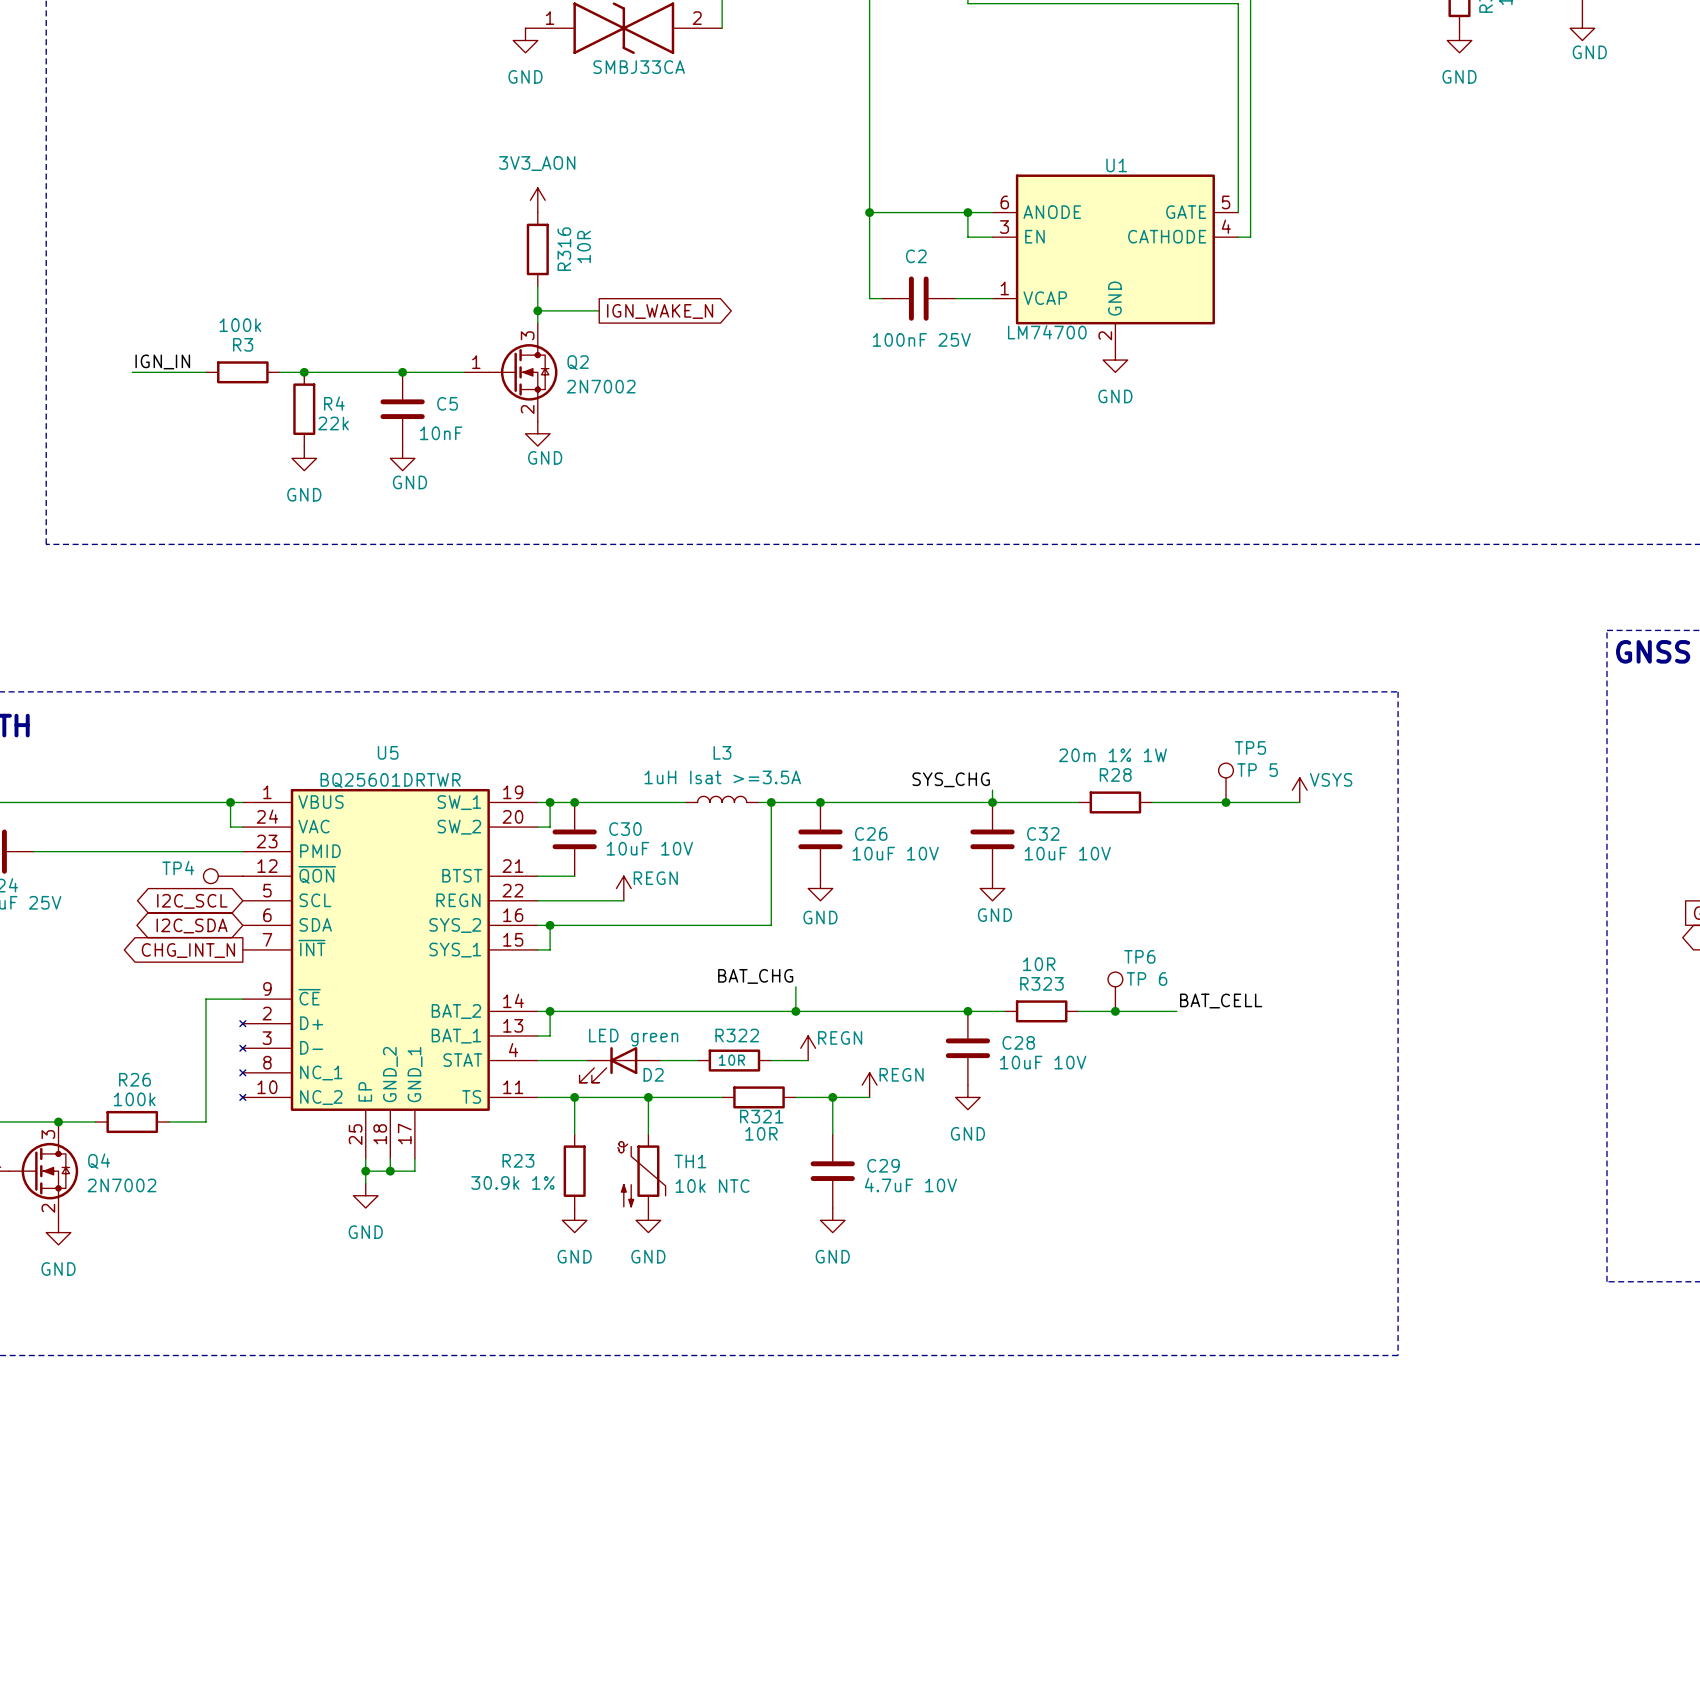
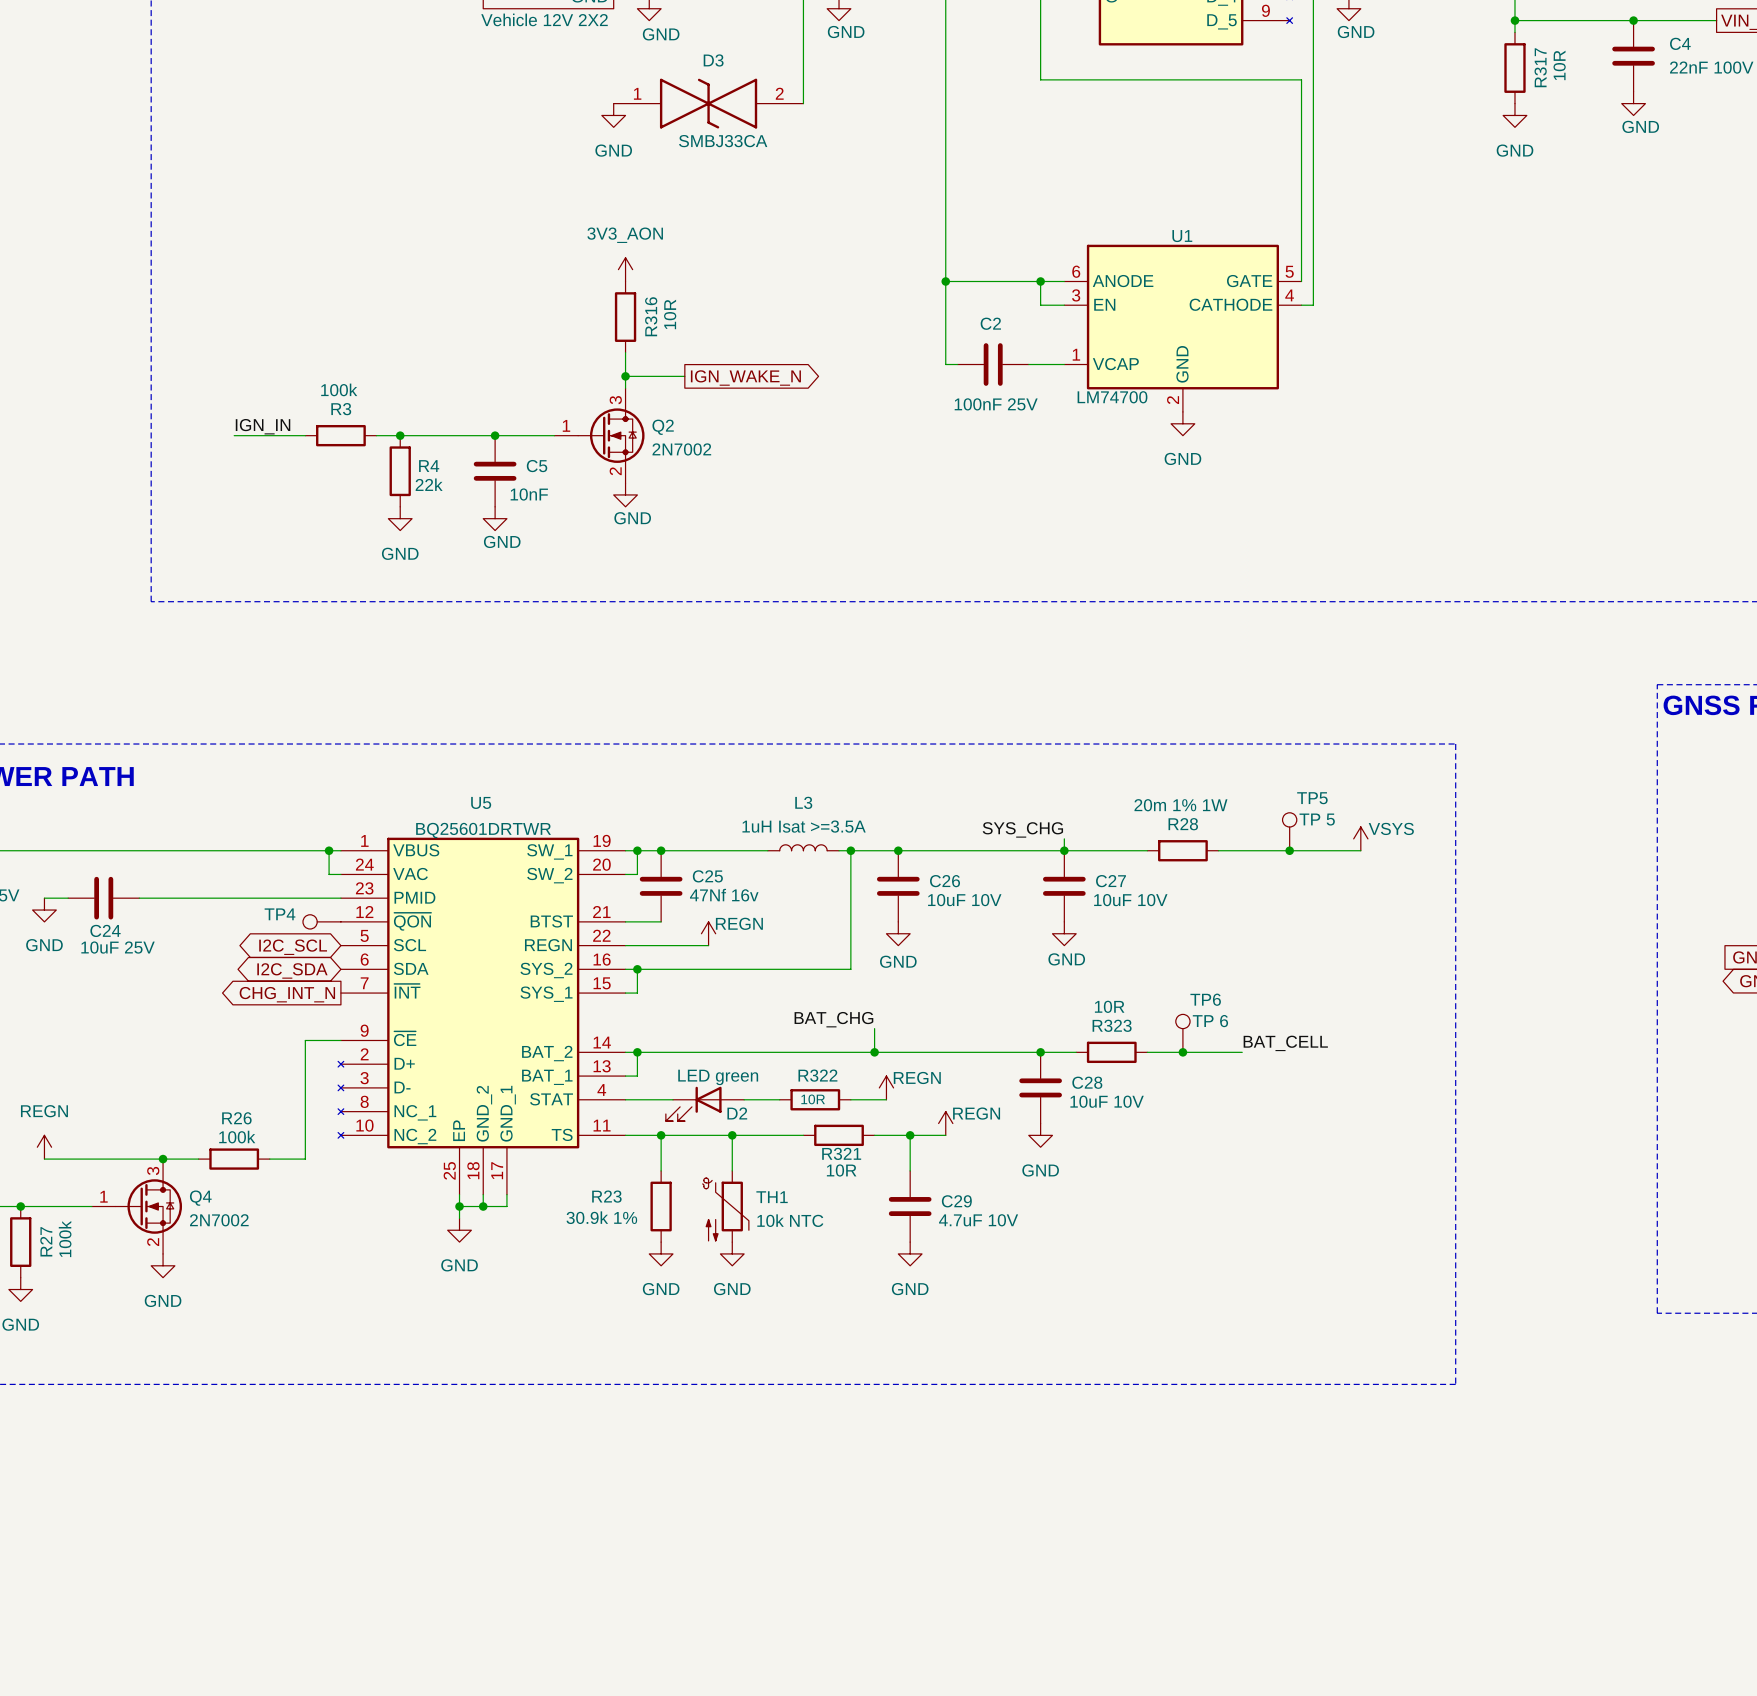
C30 name: C30 (625, 829) -> C25 (707, 876)
C32 name: C32 (1043, 833) -> C27 (1110, 881)
C30 value: 10uF 10V (649, 848) -> 47Nf 16v (724, 895)

